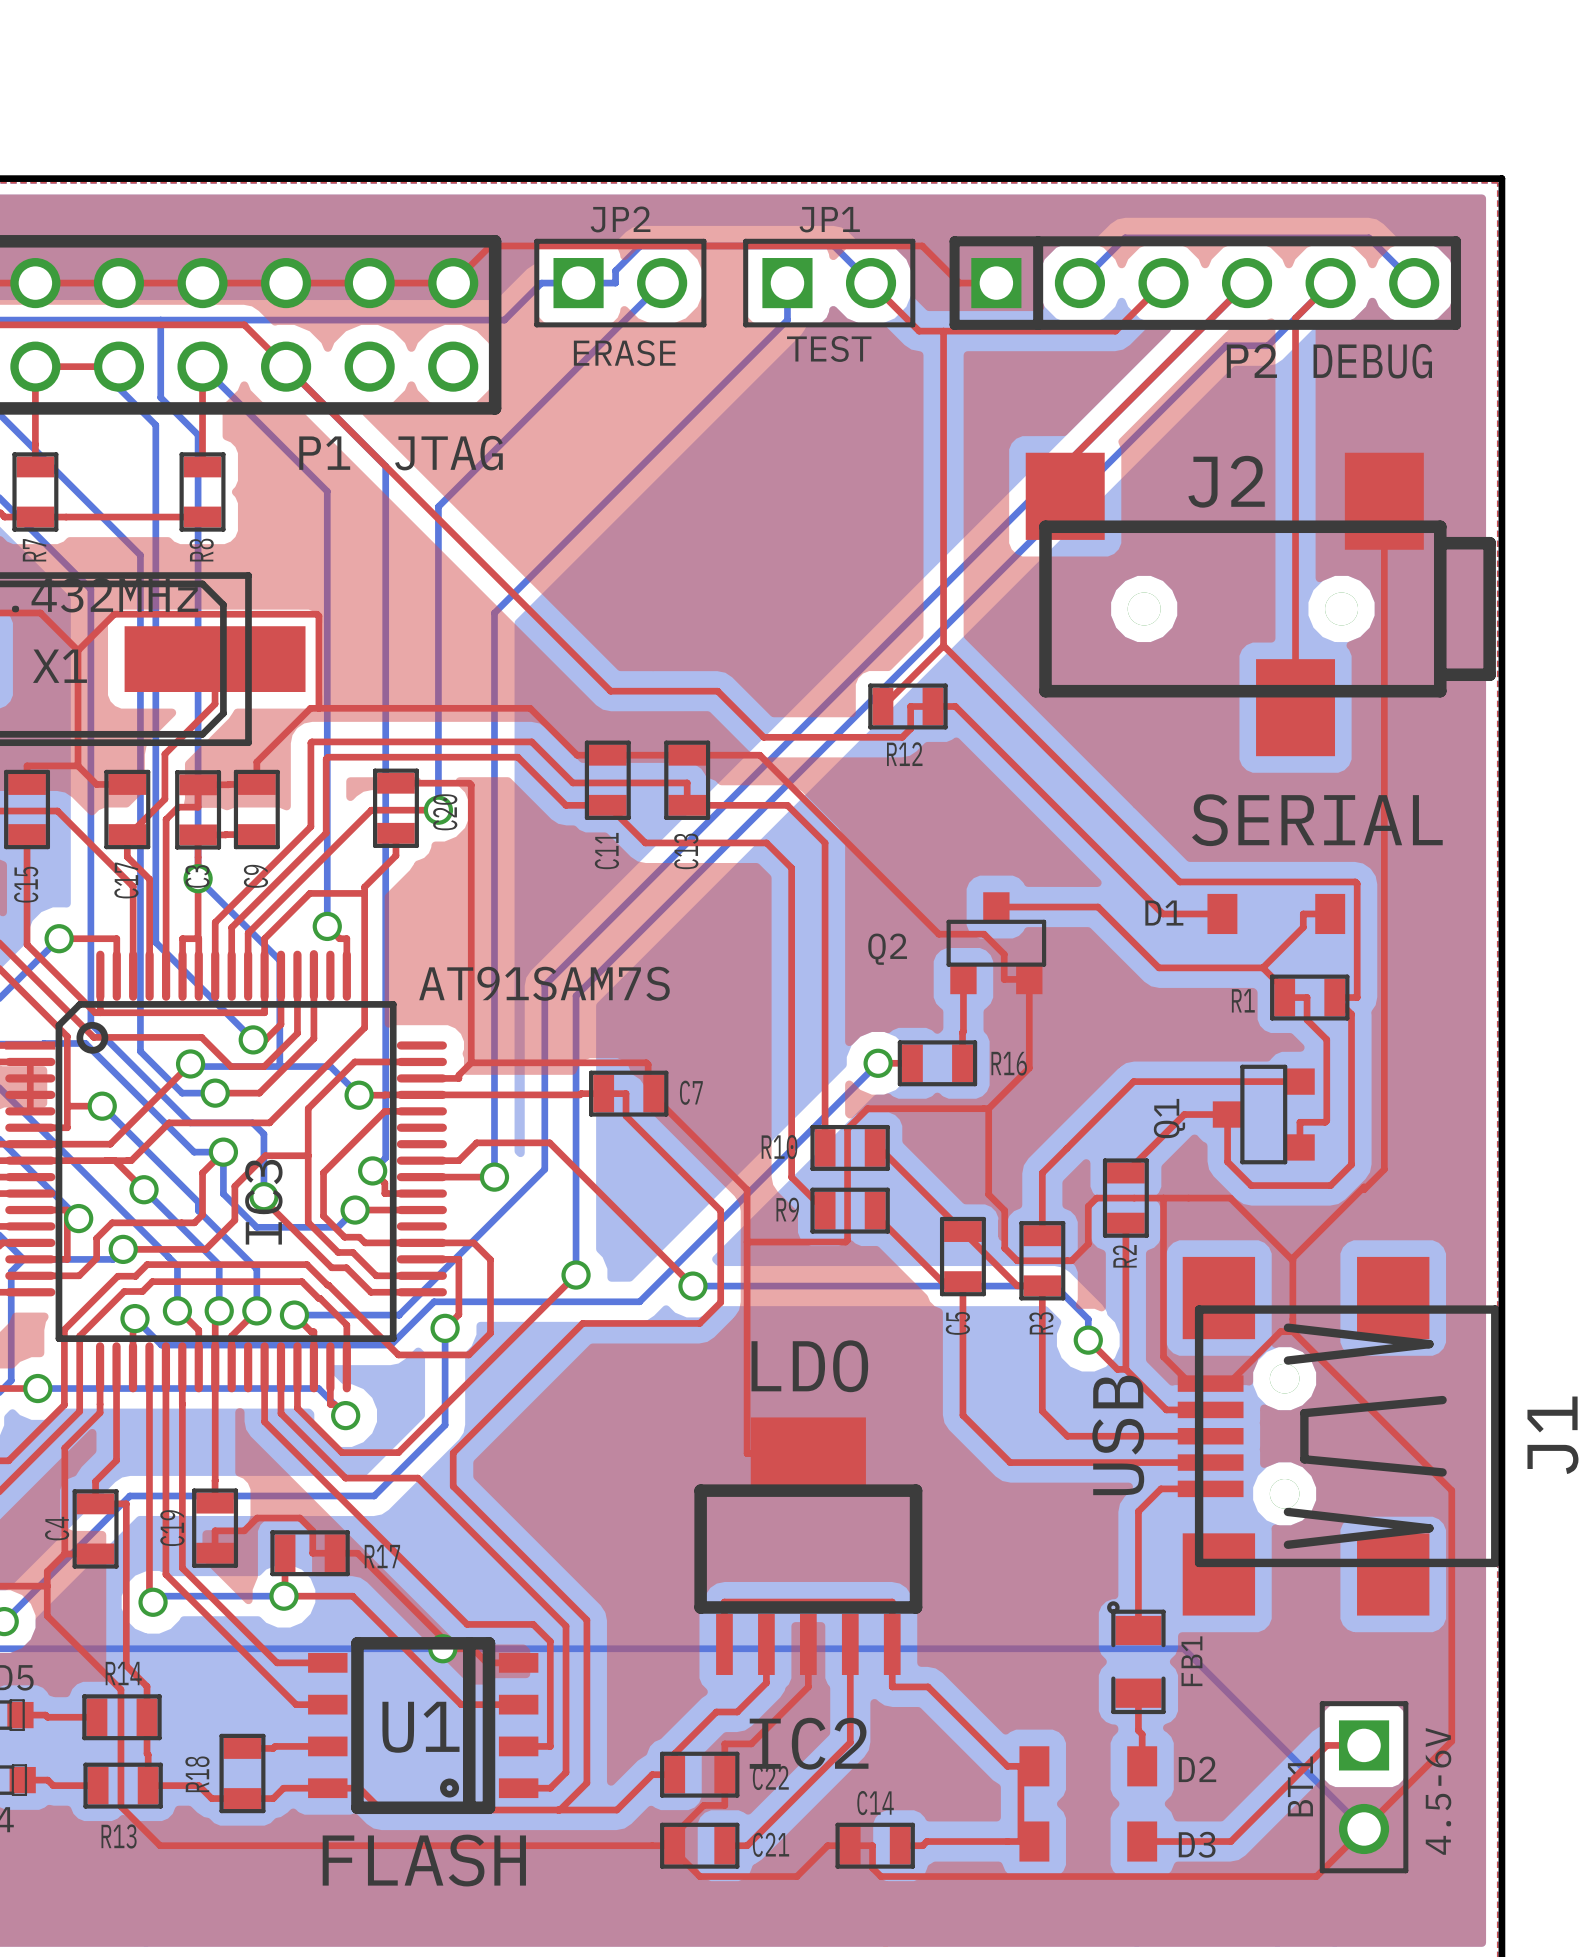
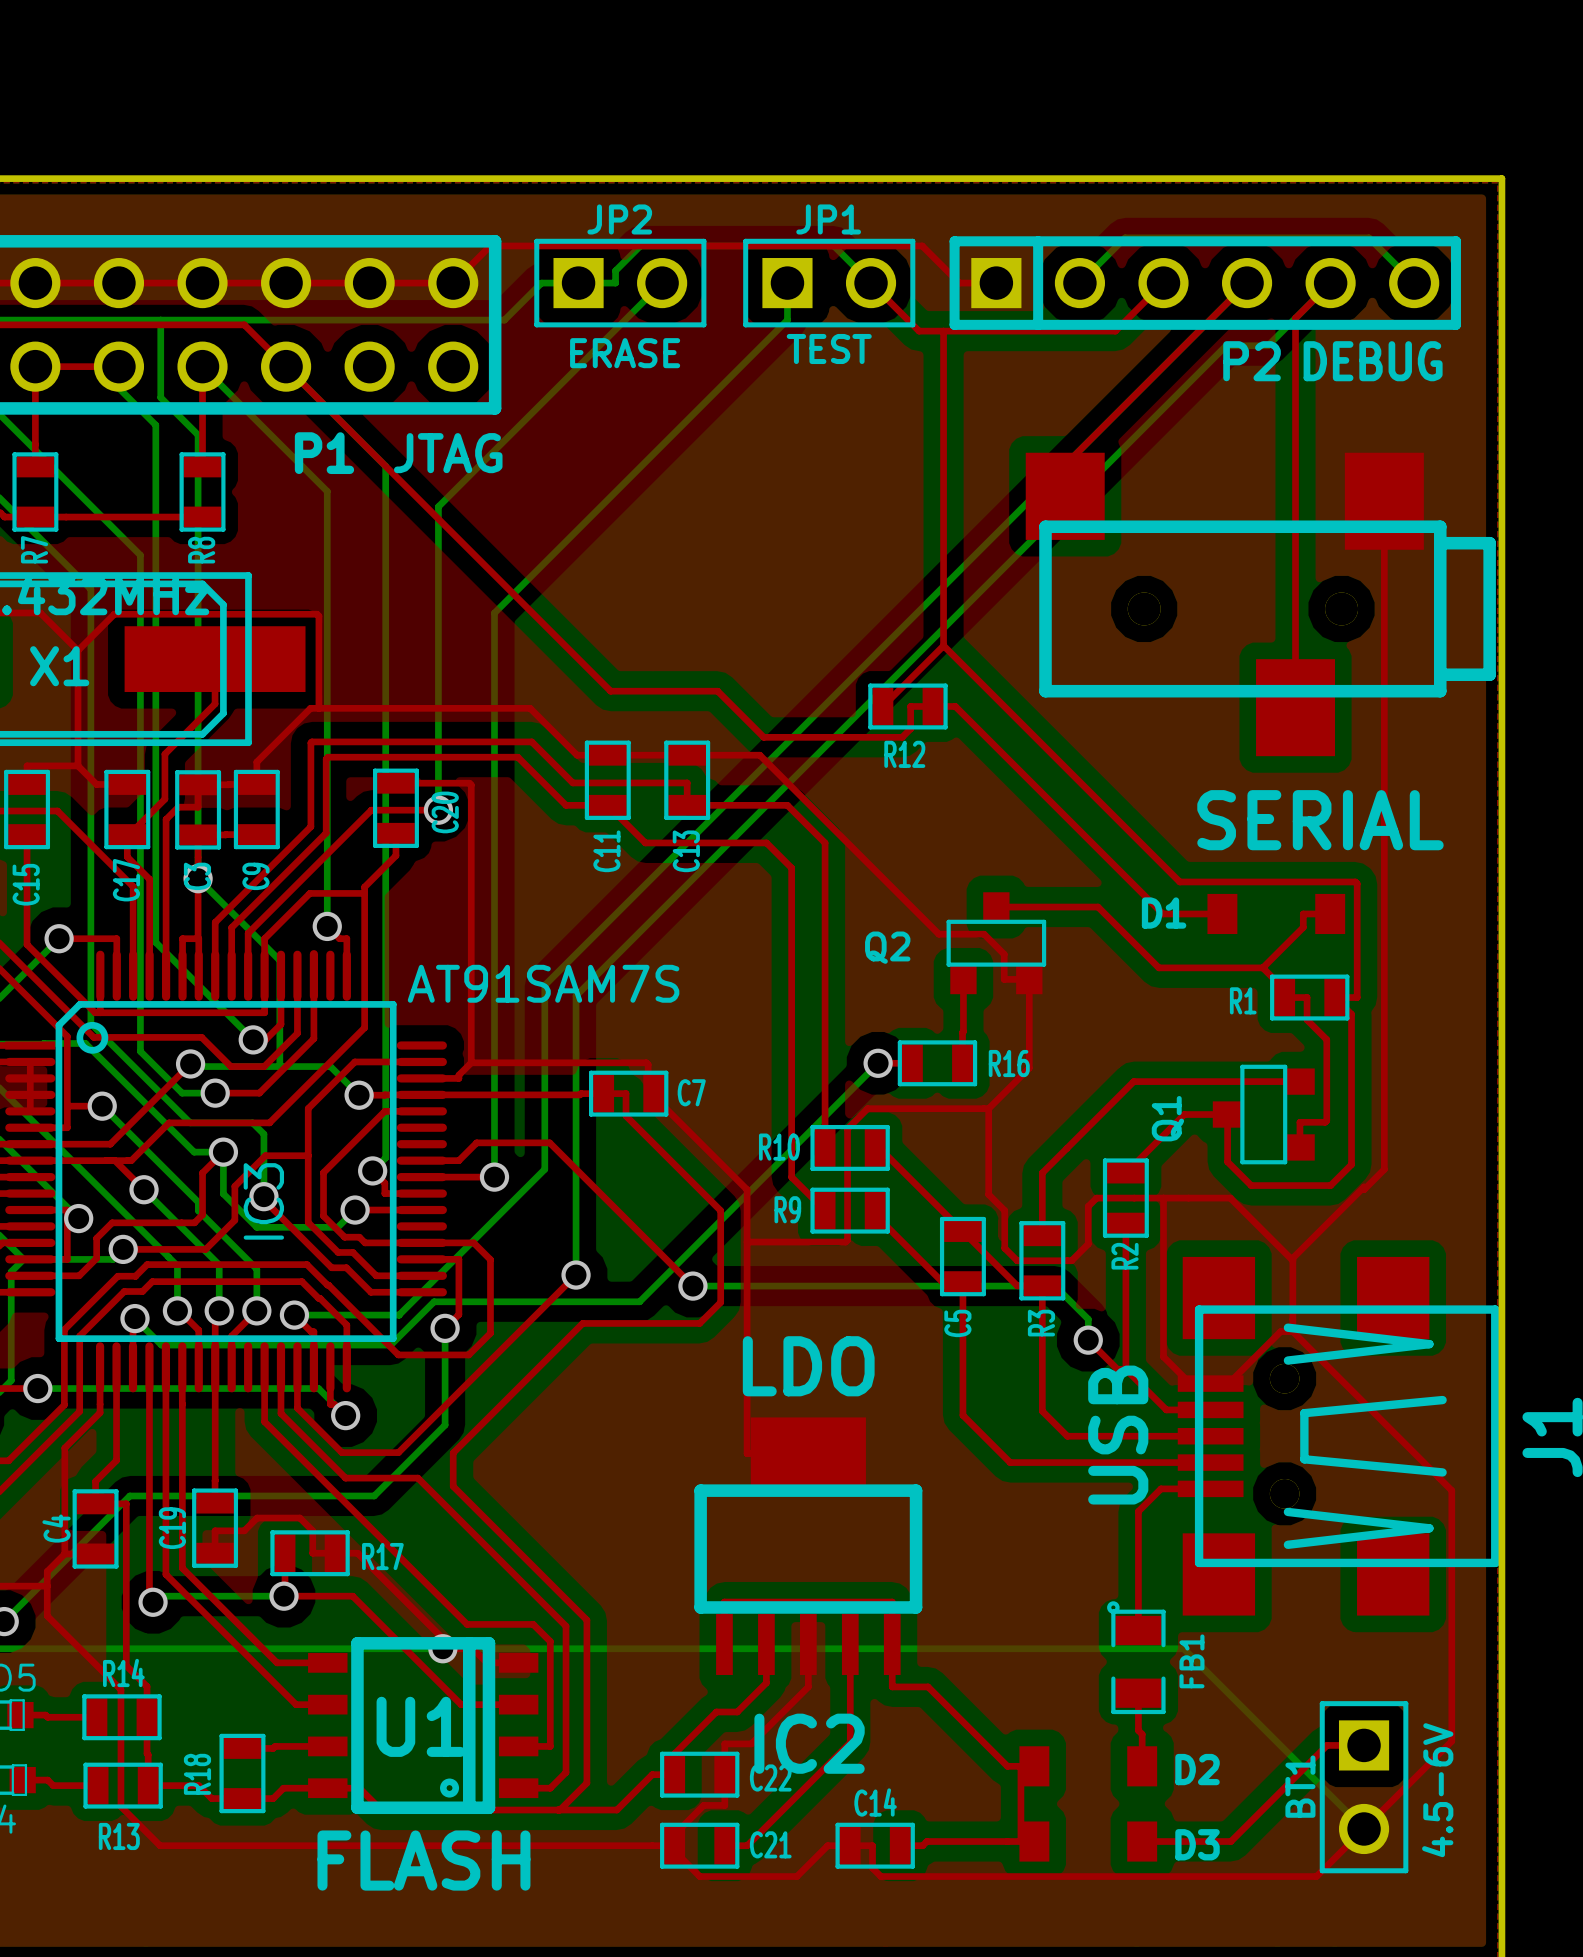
J2 name: J2 (1226, 481) -> none

